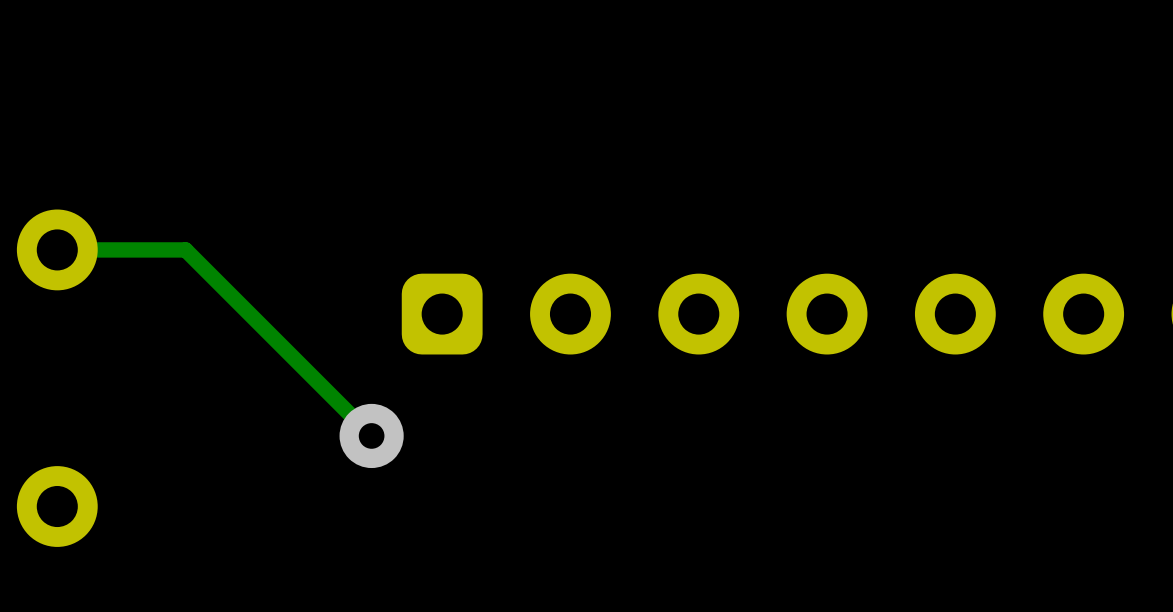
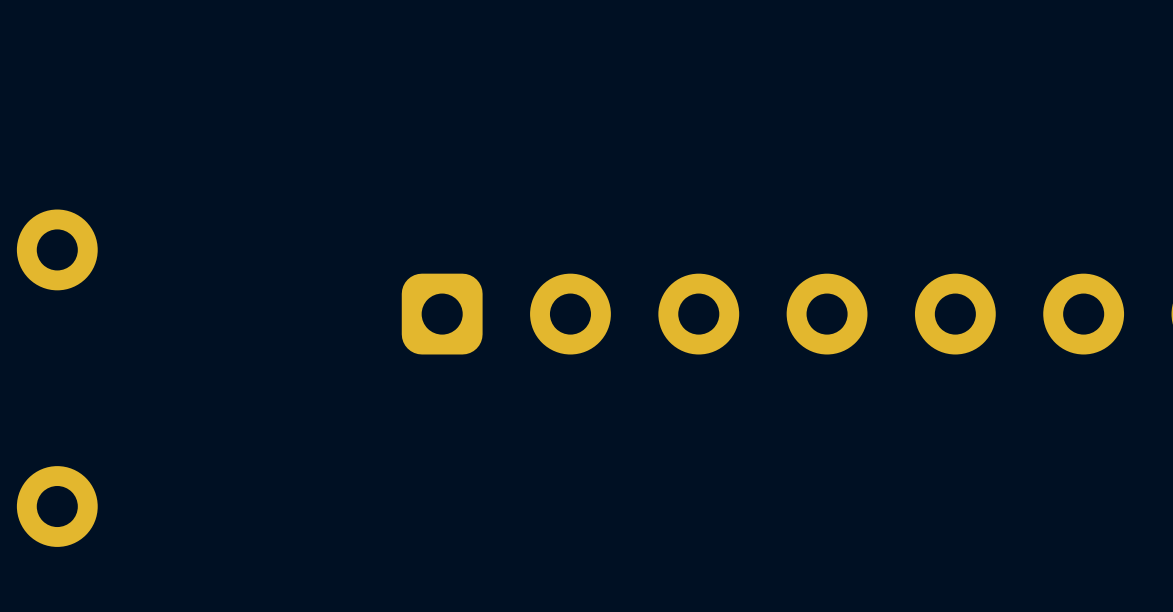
track: (57, 249) (185, 249) (371, 435) -> none
via: (371, 435) -> none

